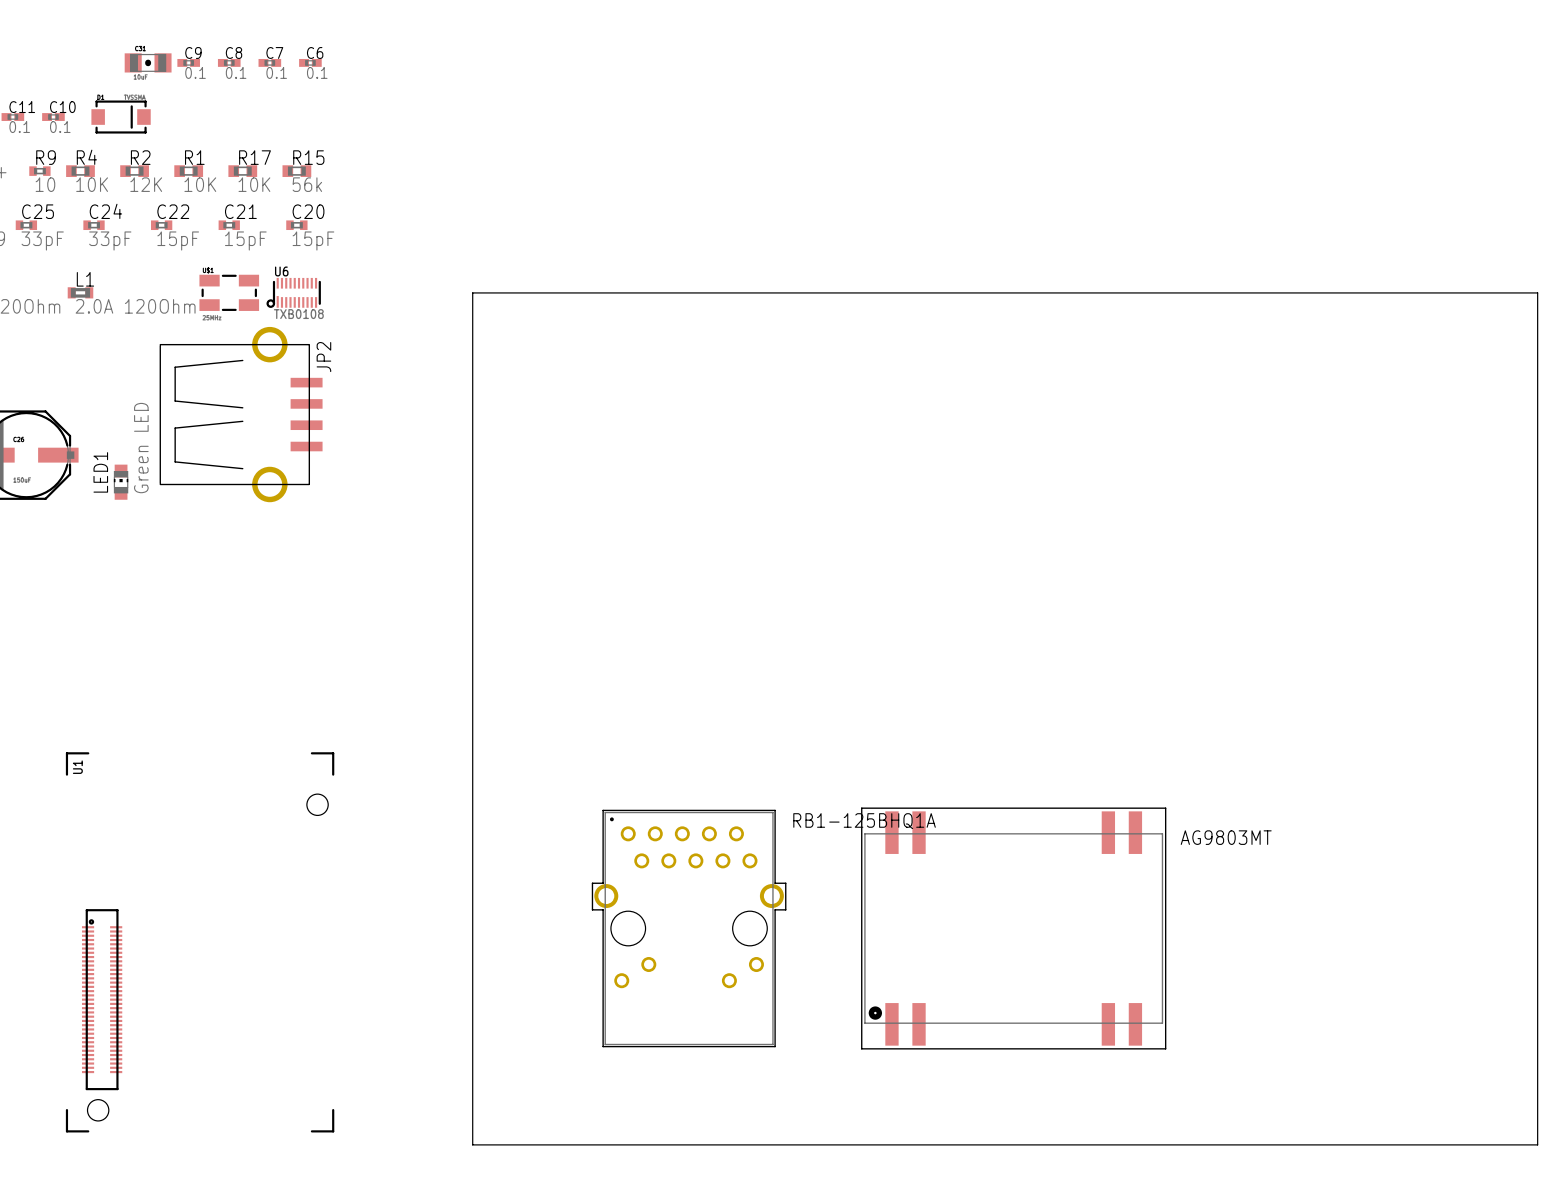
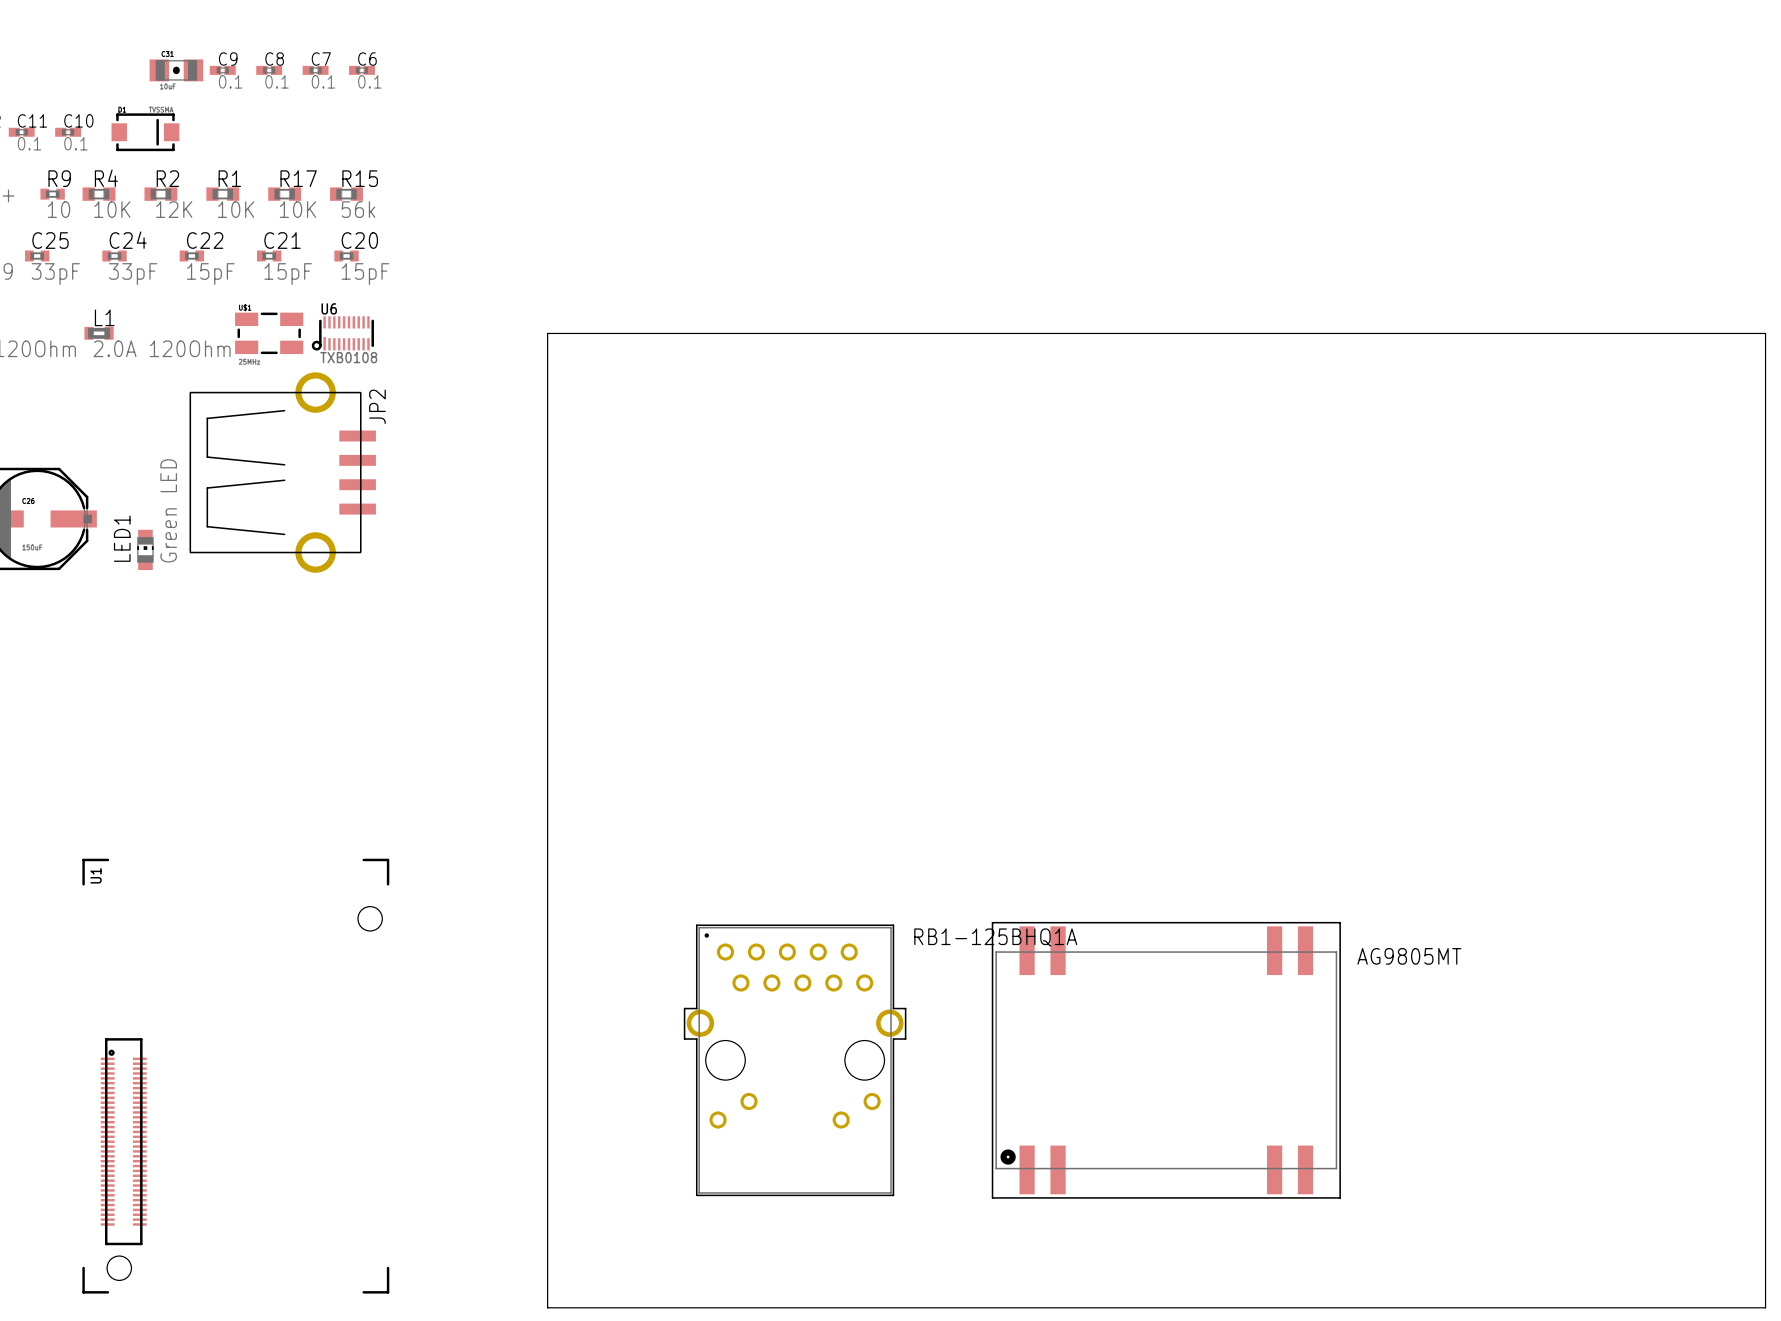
AG9803MT name: AG9803MT (1226, 837) -> AG9805MT (1409, 956)

